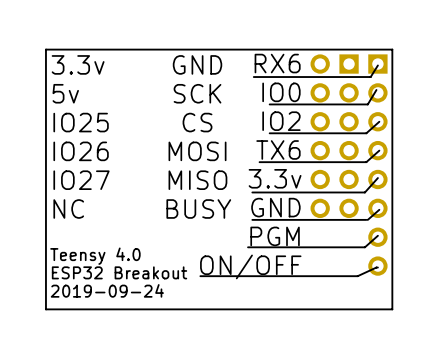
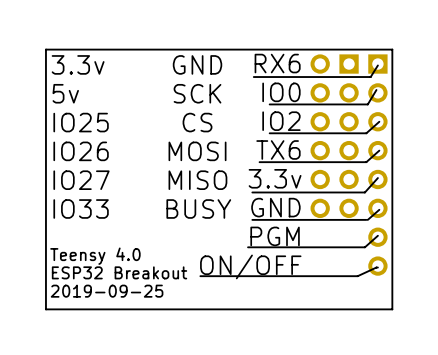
text: NC (68, 208) -> IO33 (81, 208)
text: 2019-09-24 (107, 290) -> 2019-09-25 (107, 291)

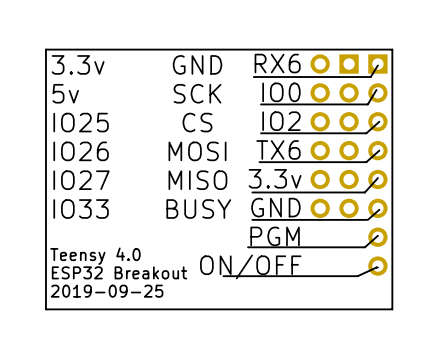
line: none -> (269, 104) (261, 104)
line: none -> (269, 133) (261, 133)
line: (223, 276) (200, 276) -> none

